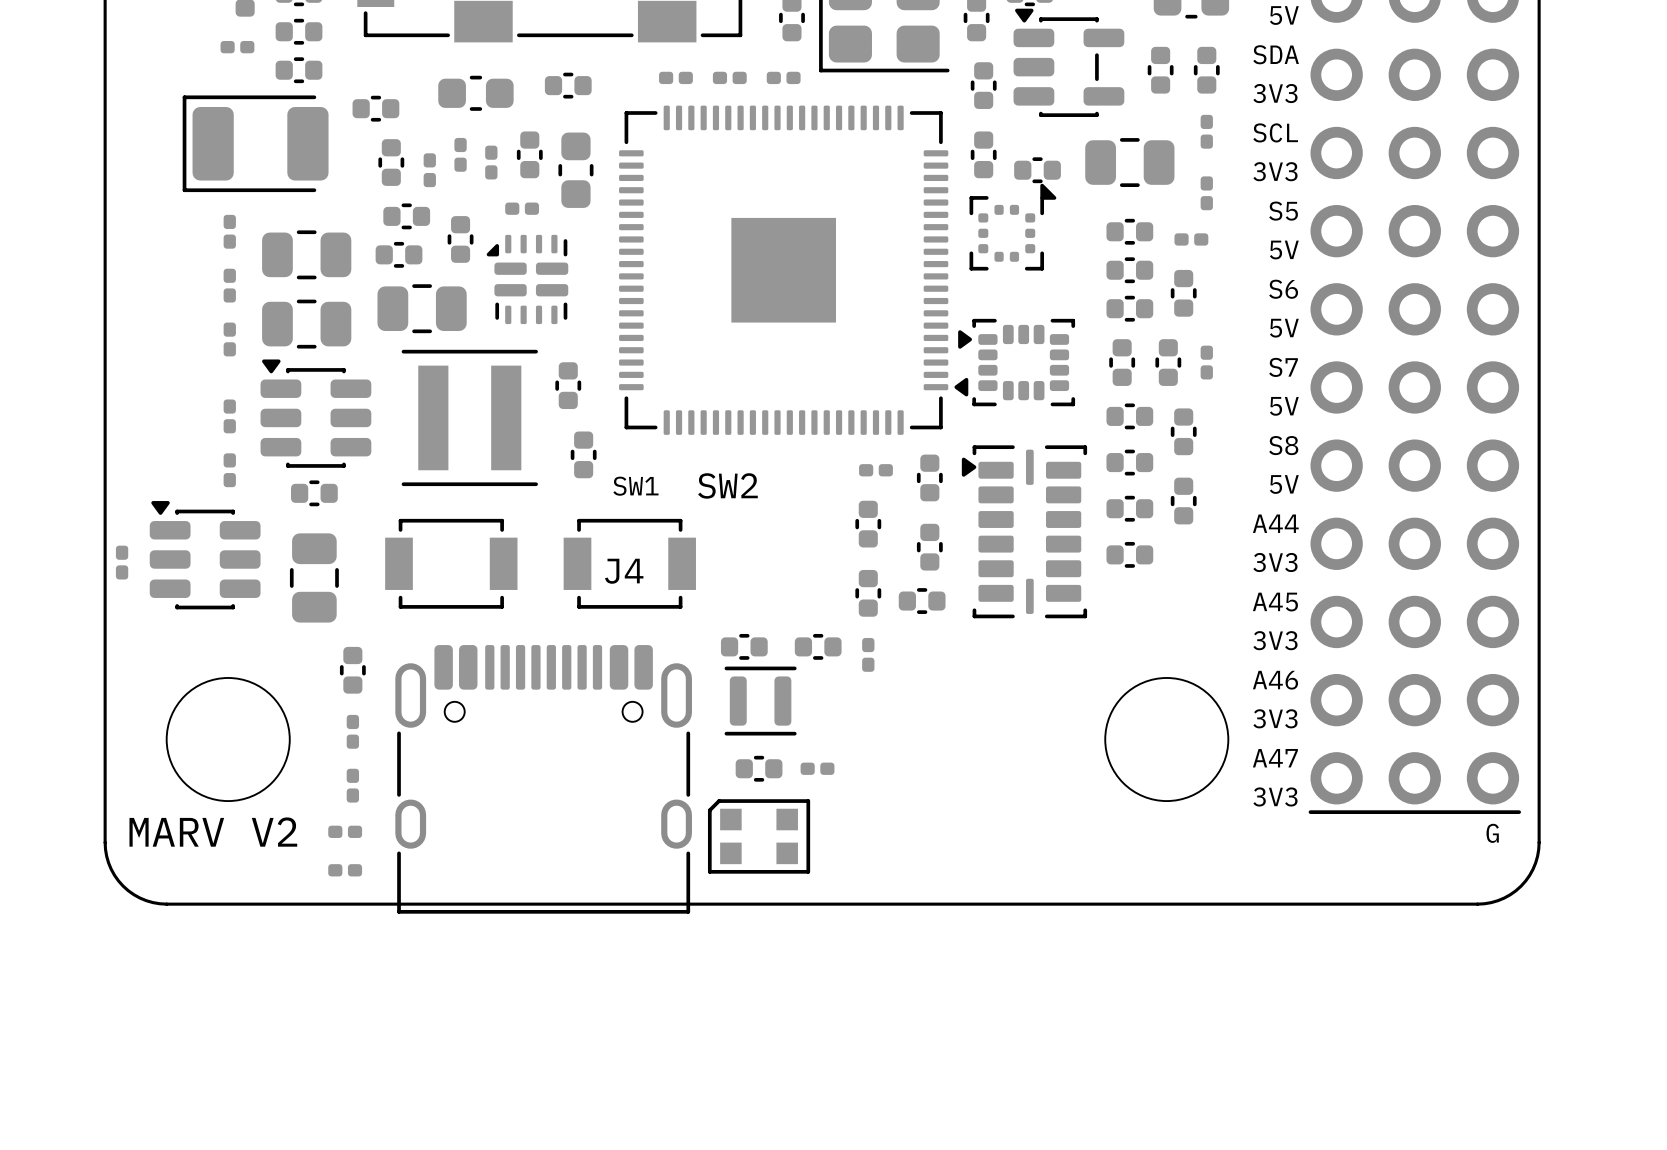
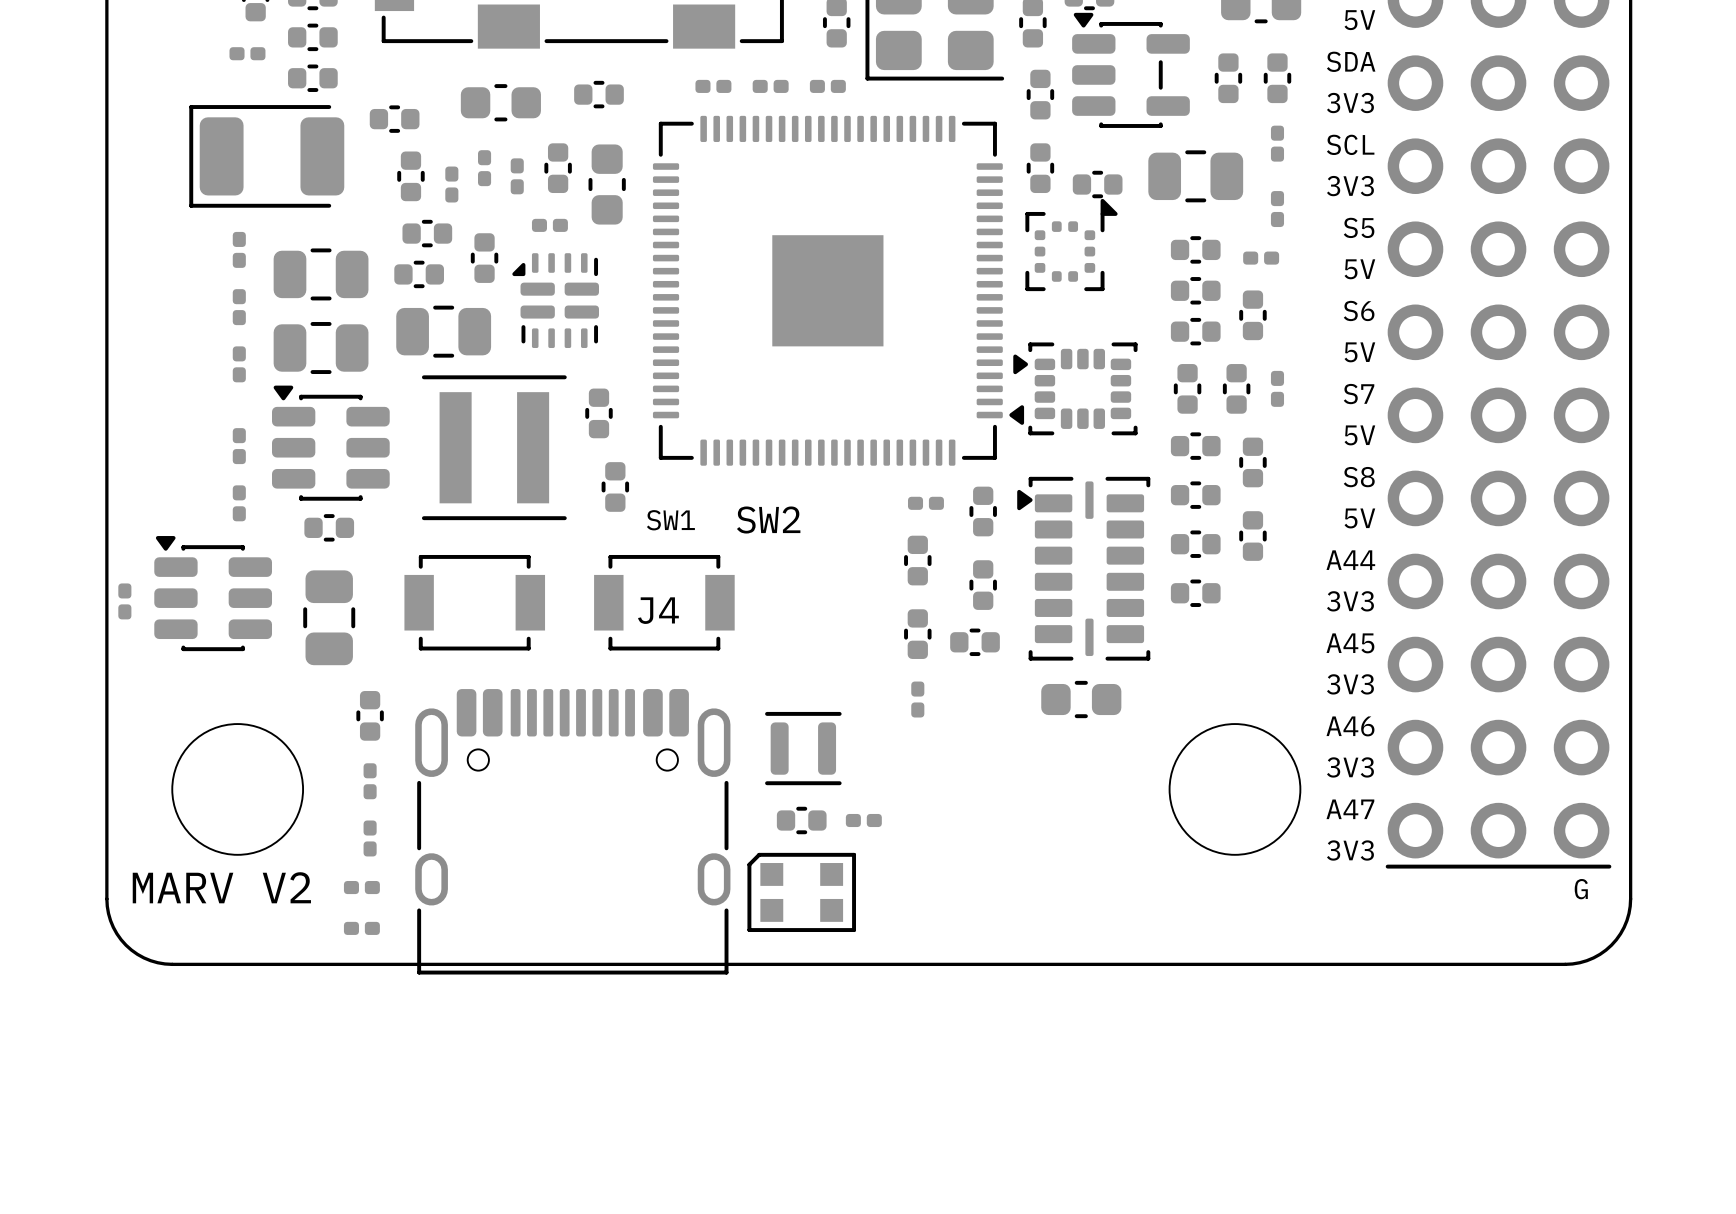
part: (744, 646) -> none
part: (818, 646) -> none
part: none -> (1081, 699)

